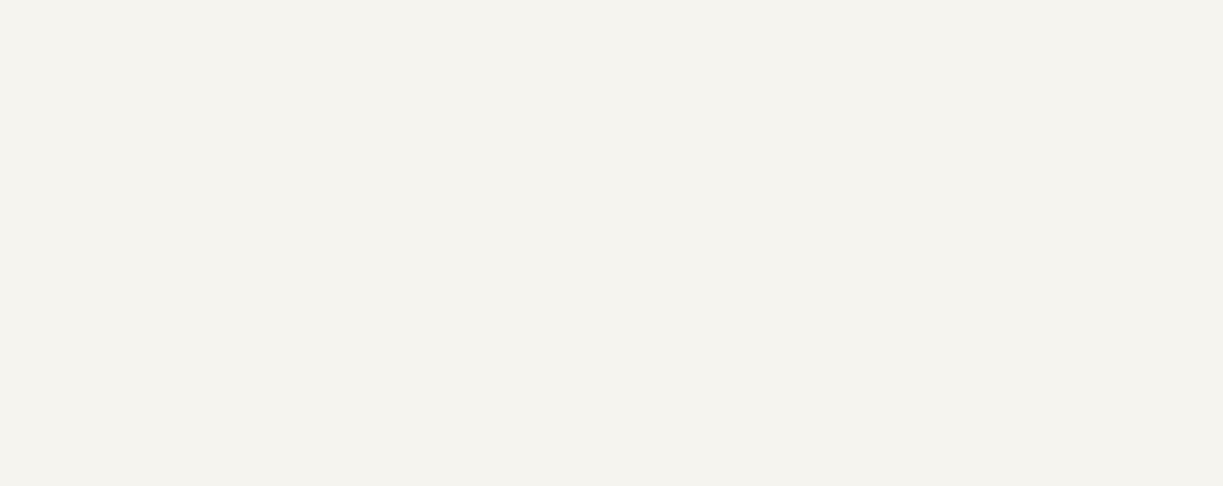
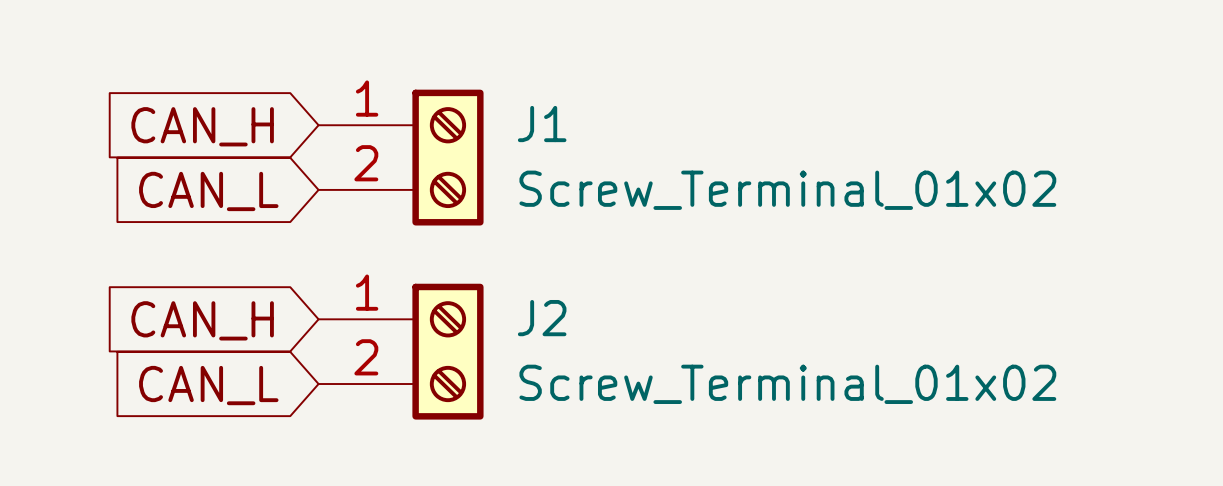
global label: none -> CAN_H (202, 126)
J1: none -> Screw_Terminal_01x02 (401, 157)
global label: none -> CAN_L (208, 191)
global label: none -> CAN_H (202, 320)
J2: none -> Screw_Terminal_01x02 (401, 351)
global label: none -> CAN_L (208, 385)

